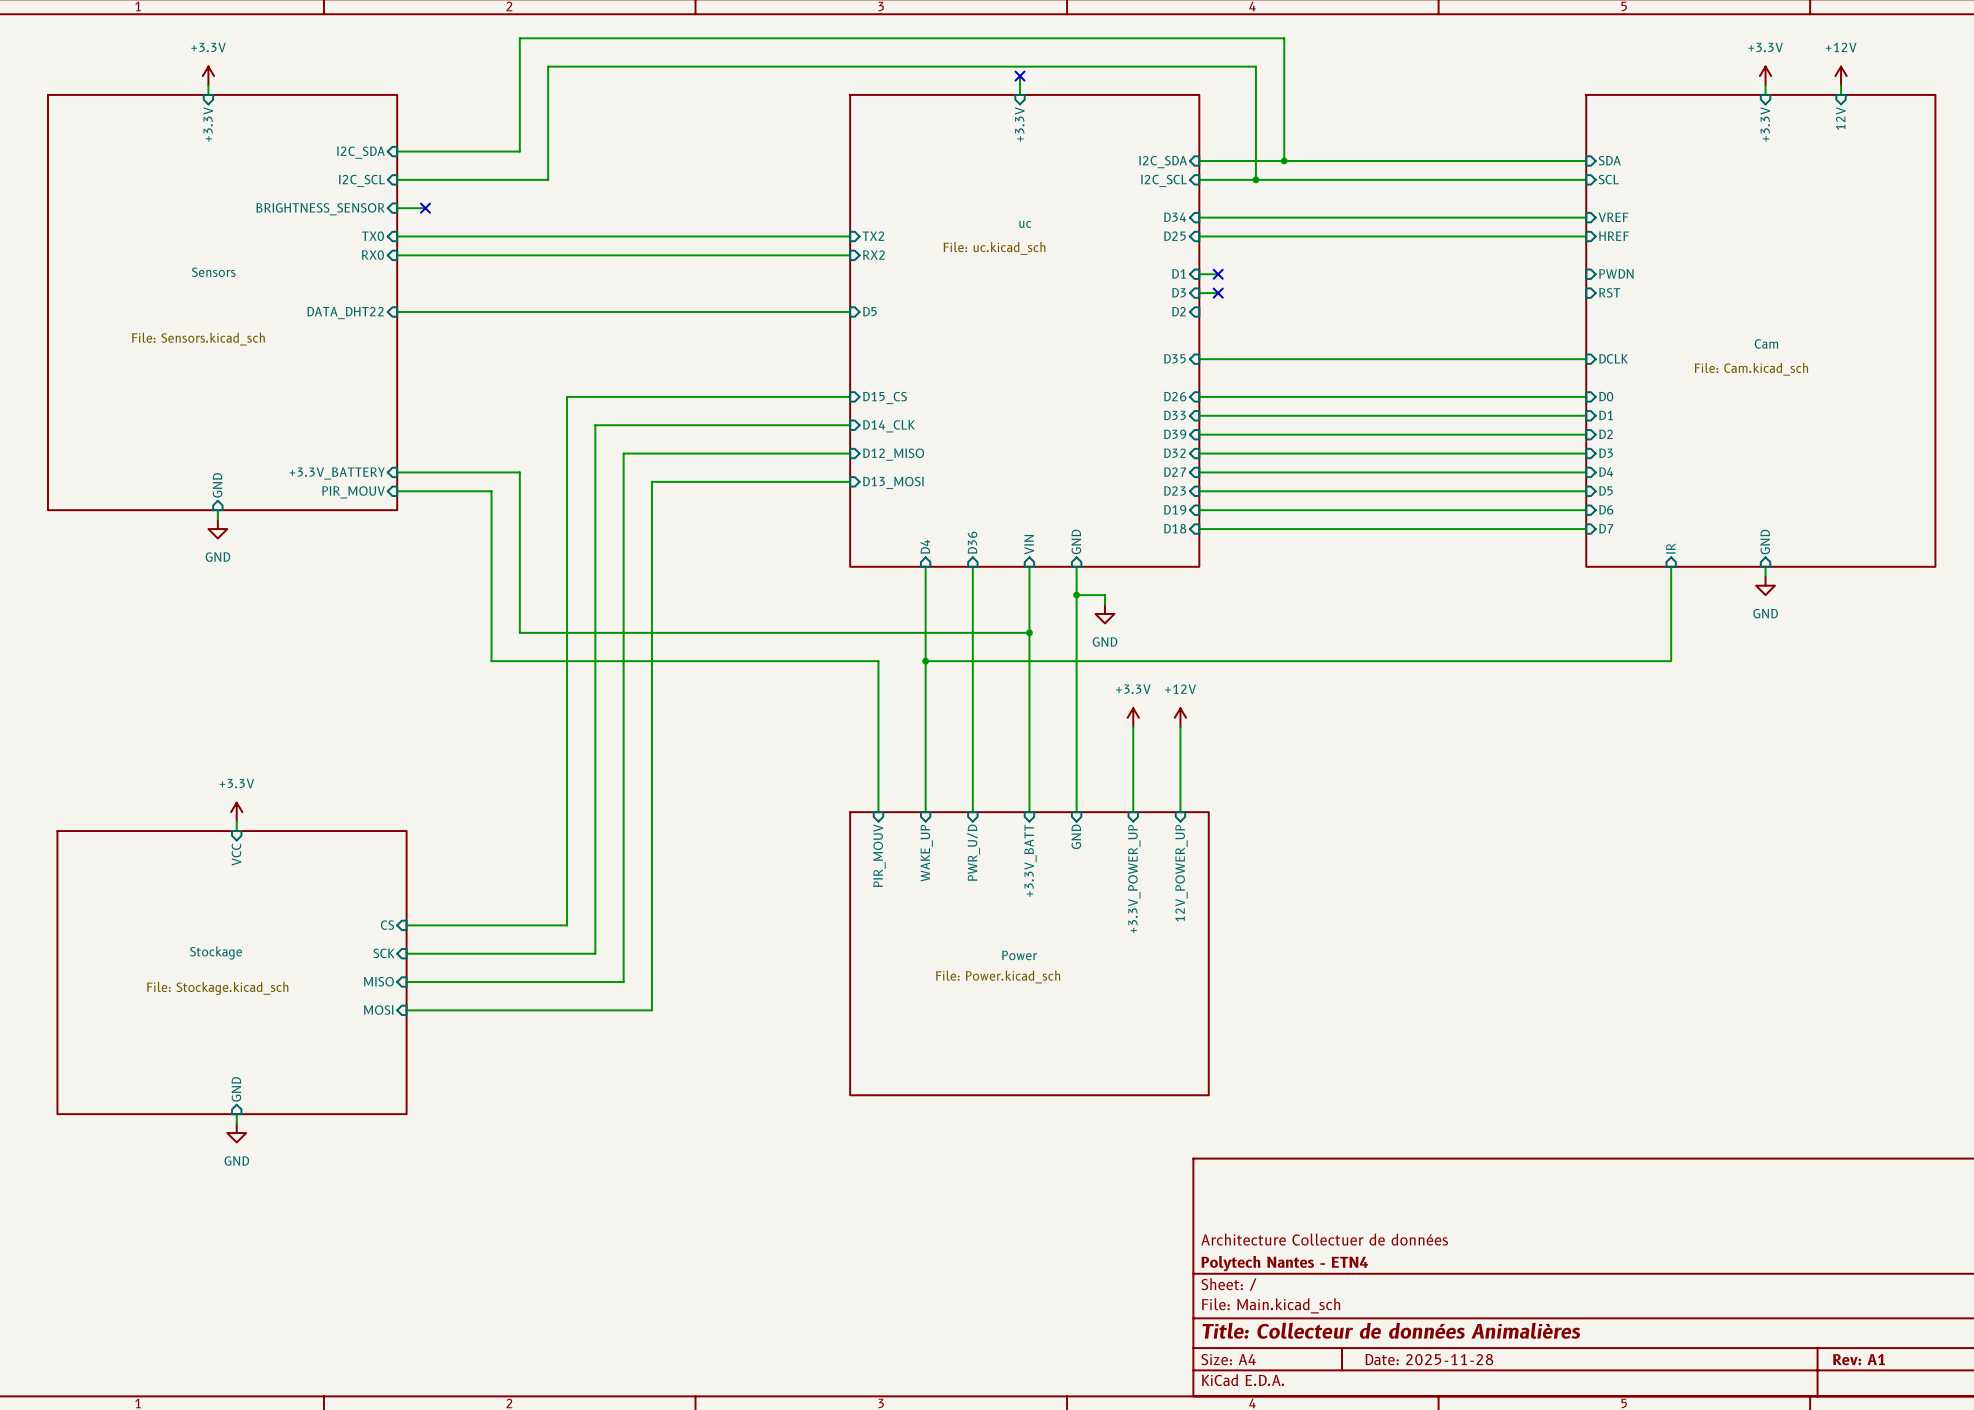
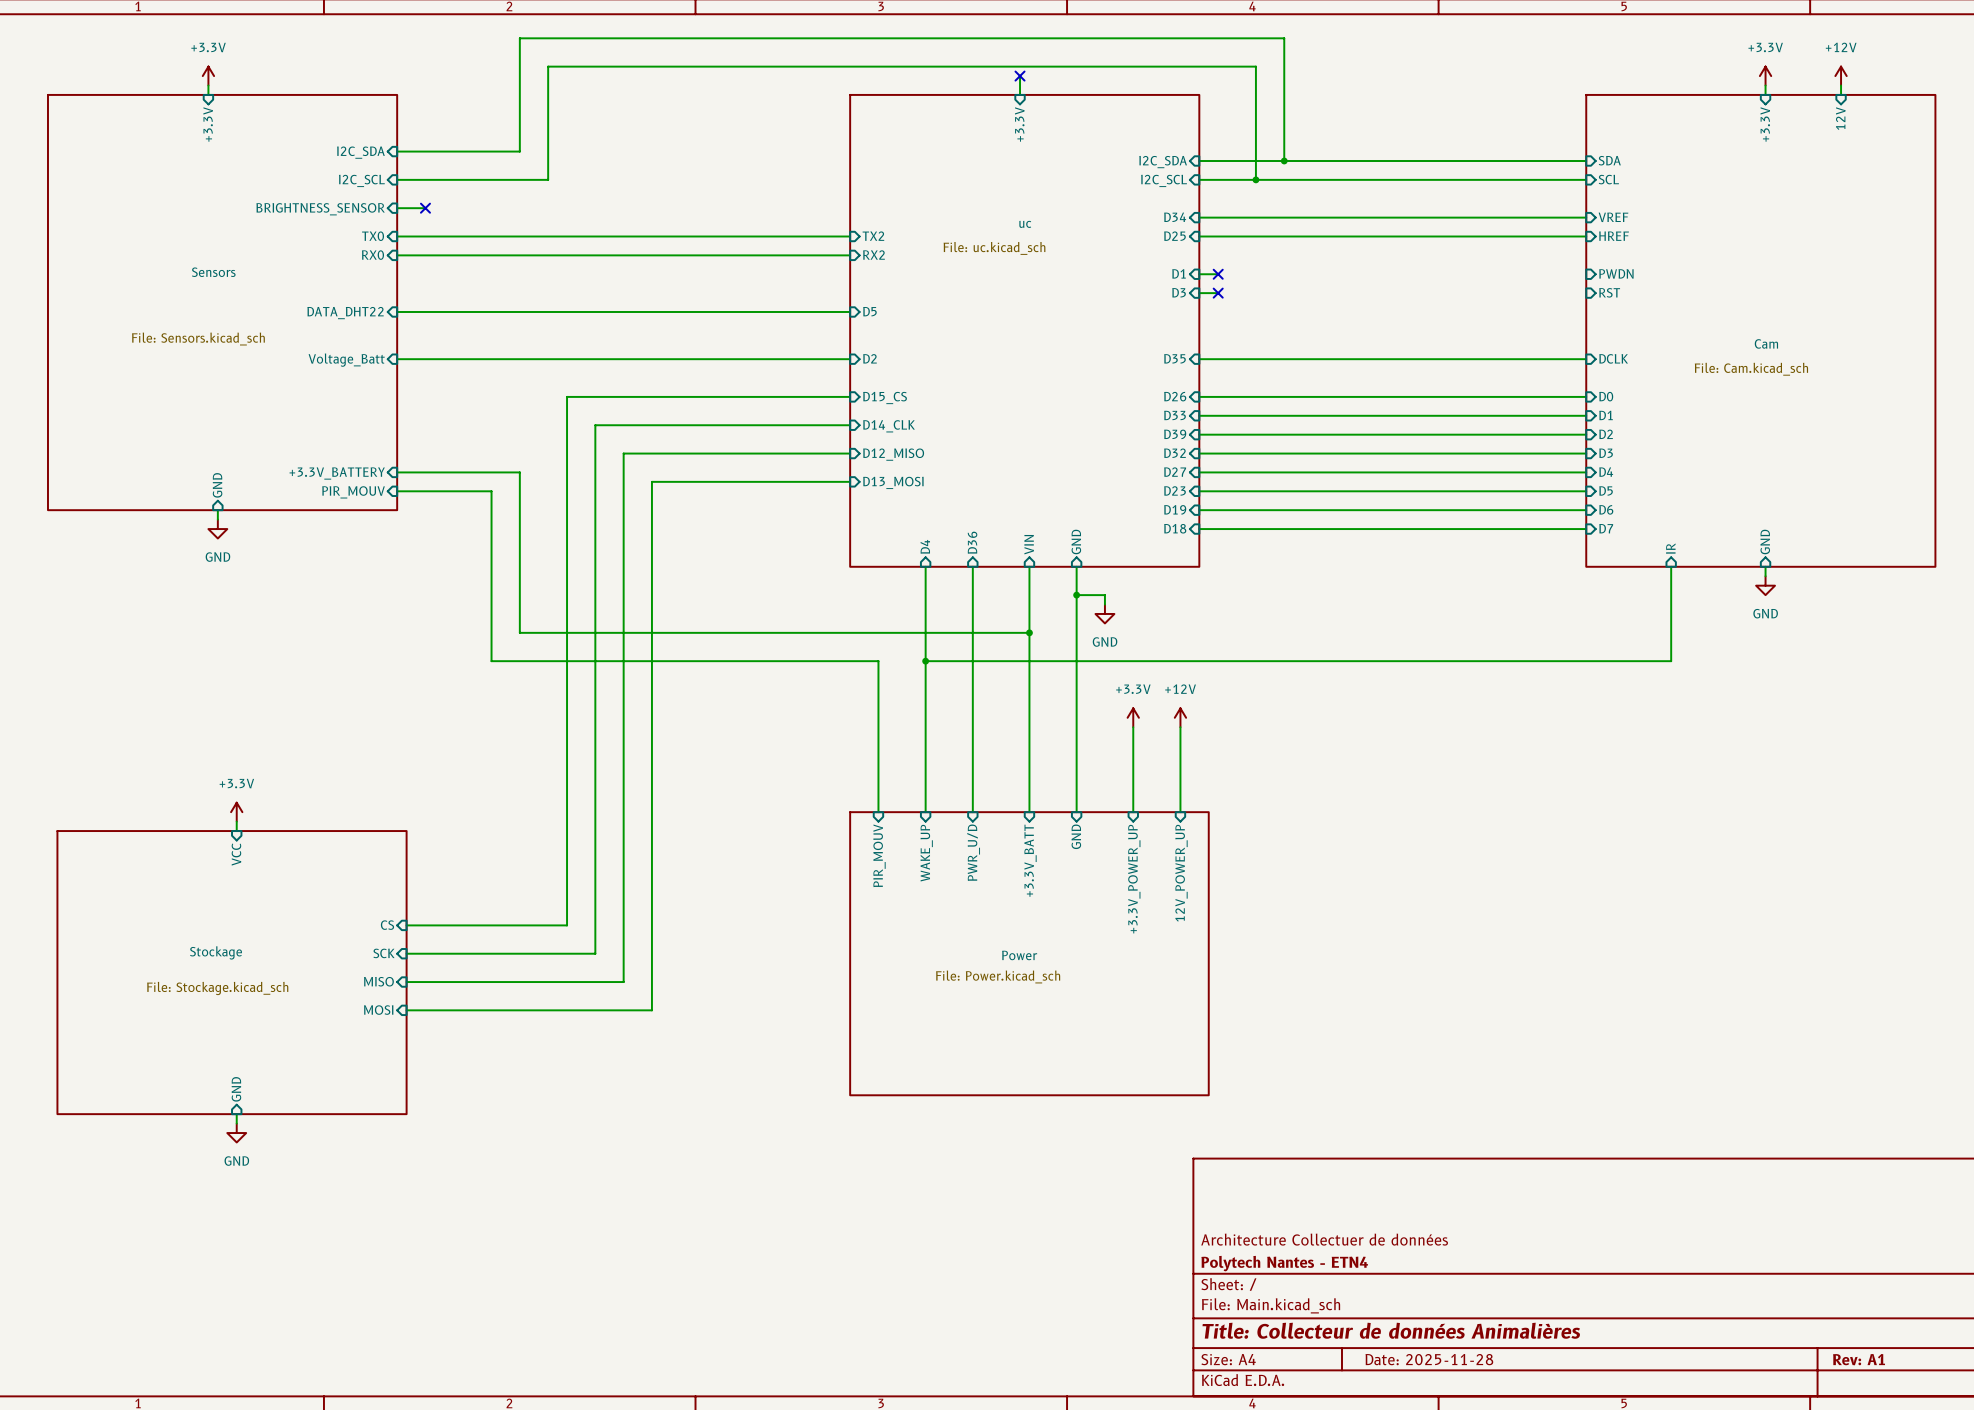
sheet pin: D2 (1179, 311) -> none
sheet pin: none -> D2 (869, 358)
wire: none -> (397, 359) (850, 359)
sheet pin: none -> Voltage_Batt (346, 360)

